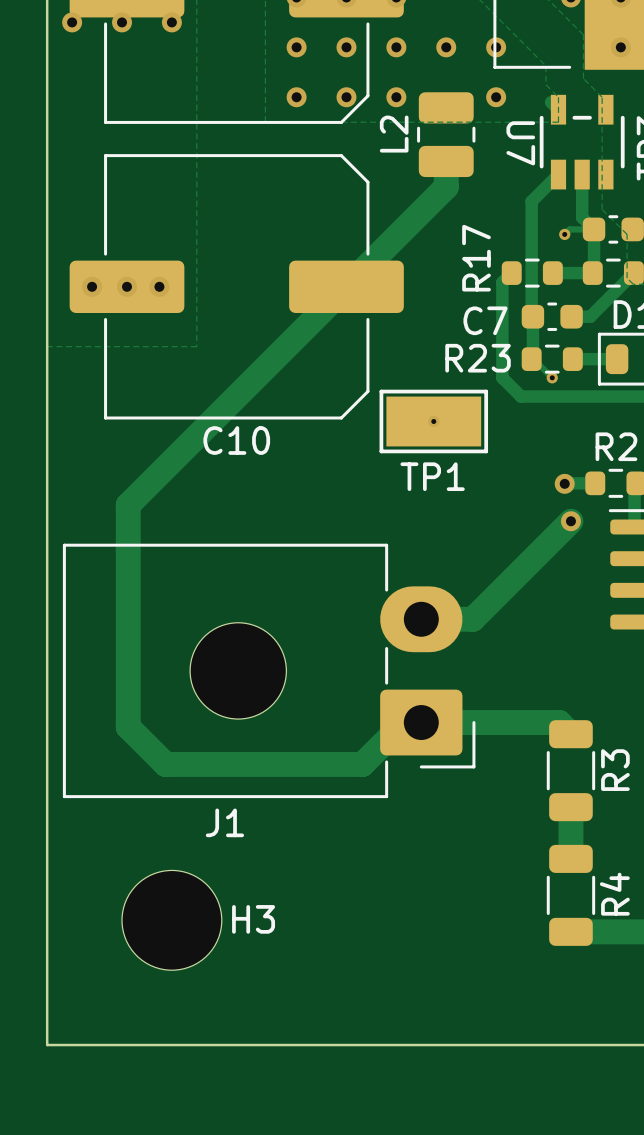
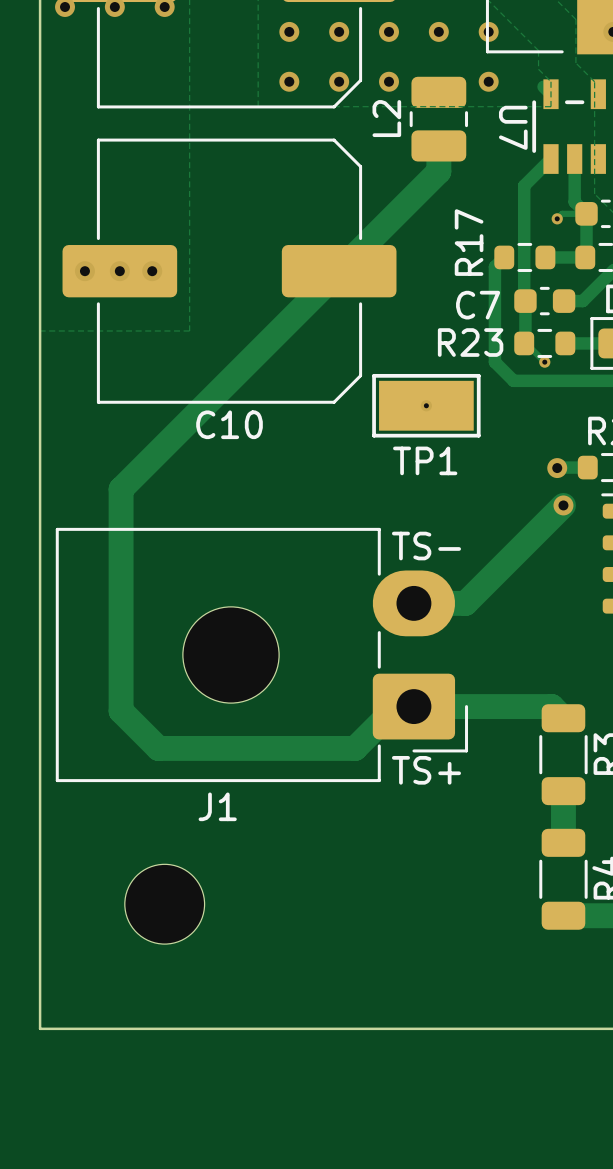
text: none -> TS- (426, 546)
text: none -> TS+ (426, 770)
H3: (171, 920) -> none
part: none -> (164, 904)

